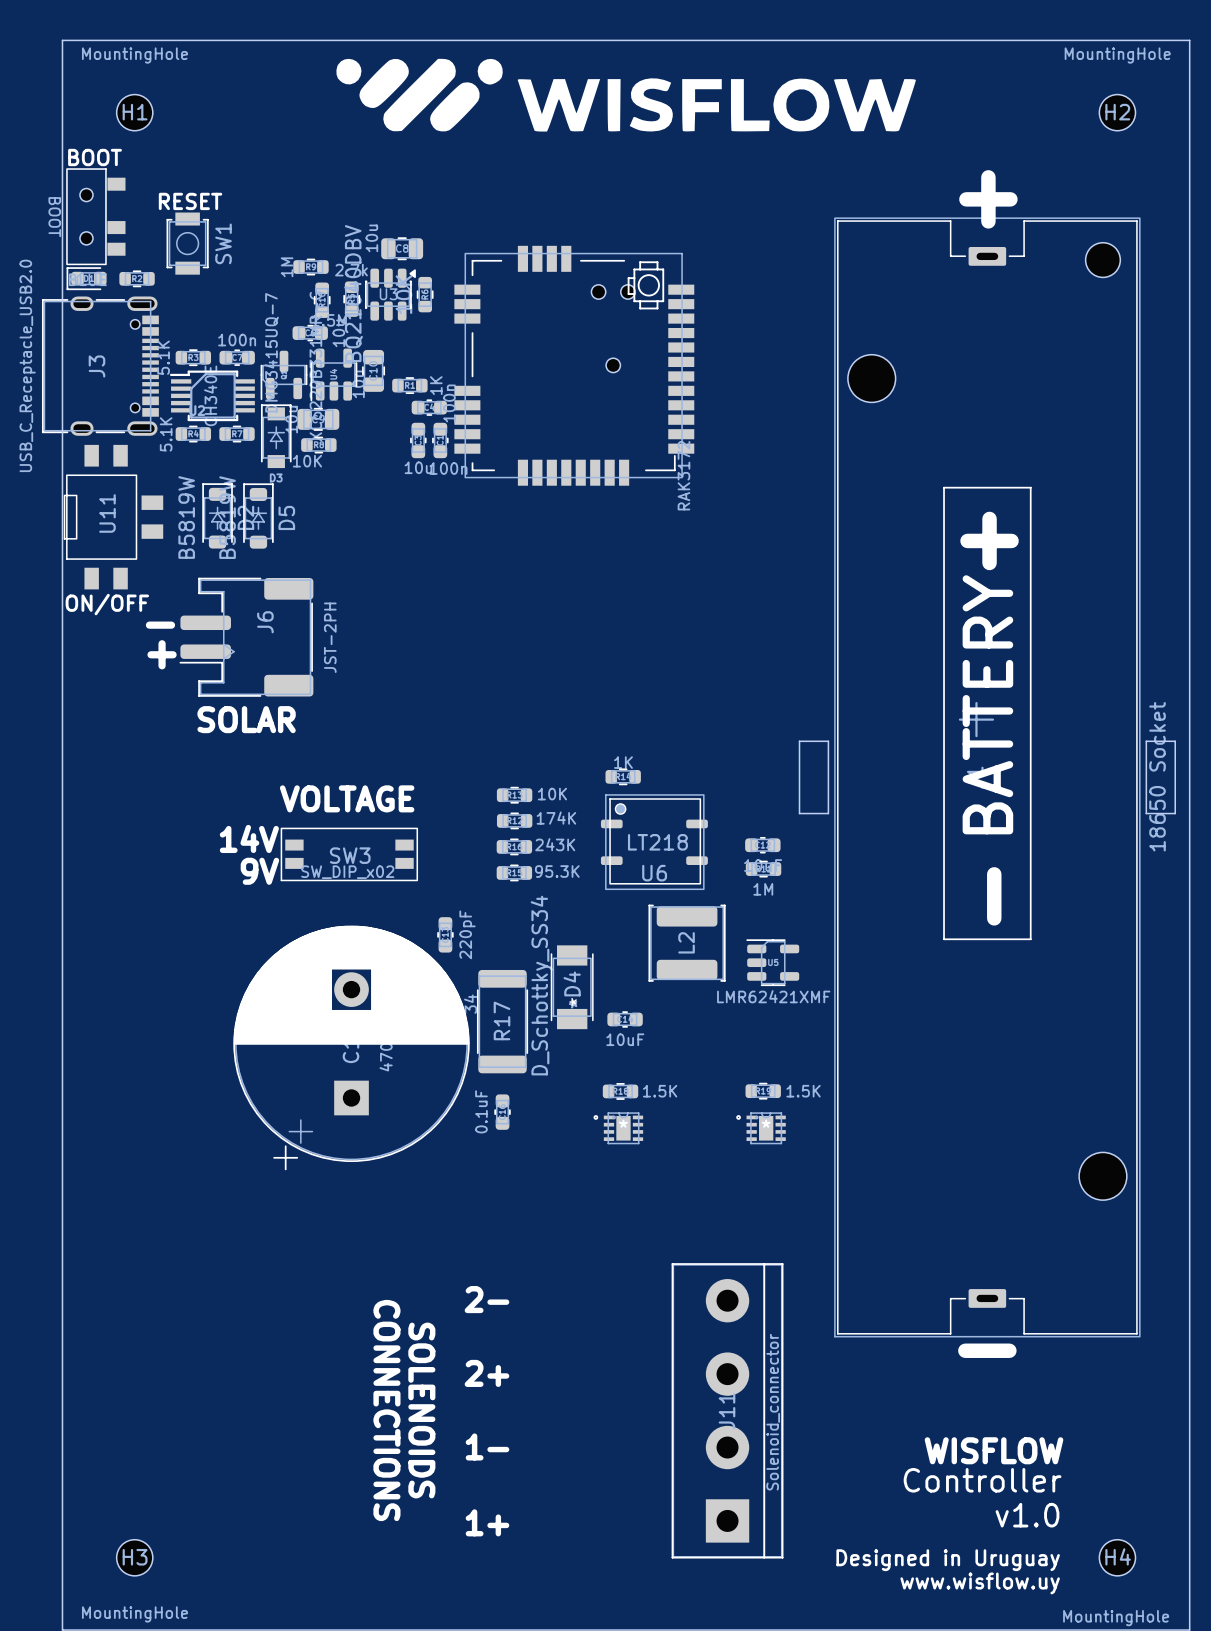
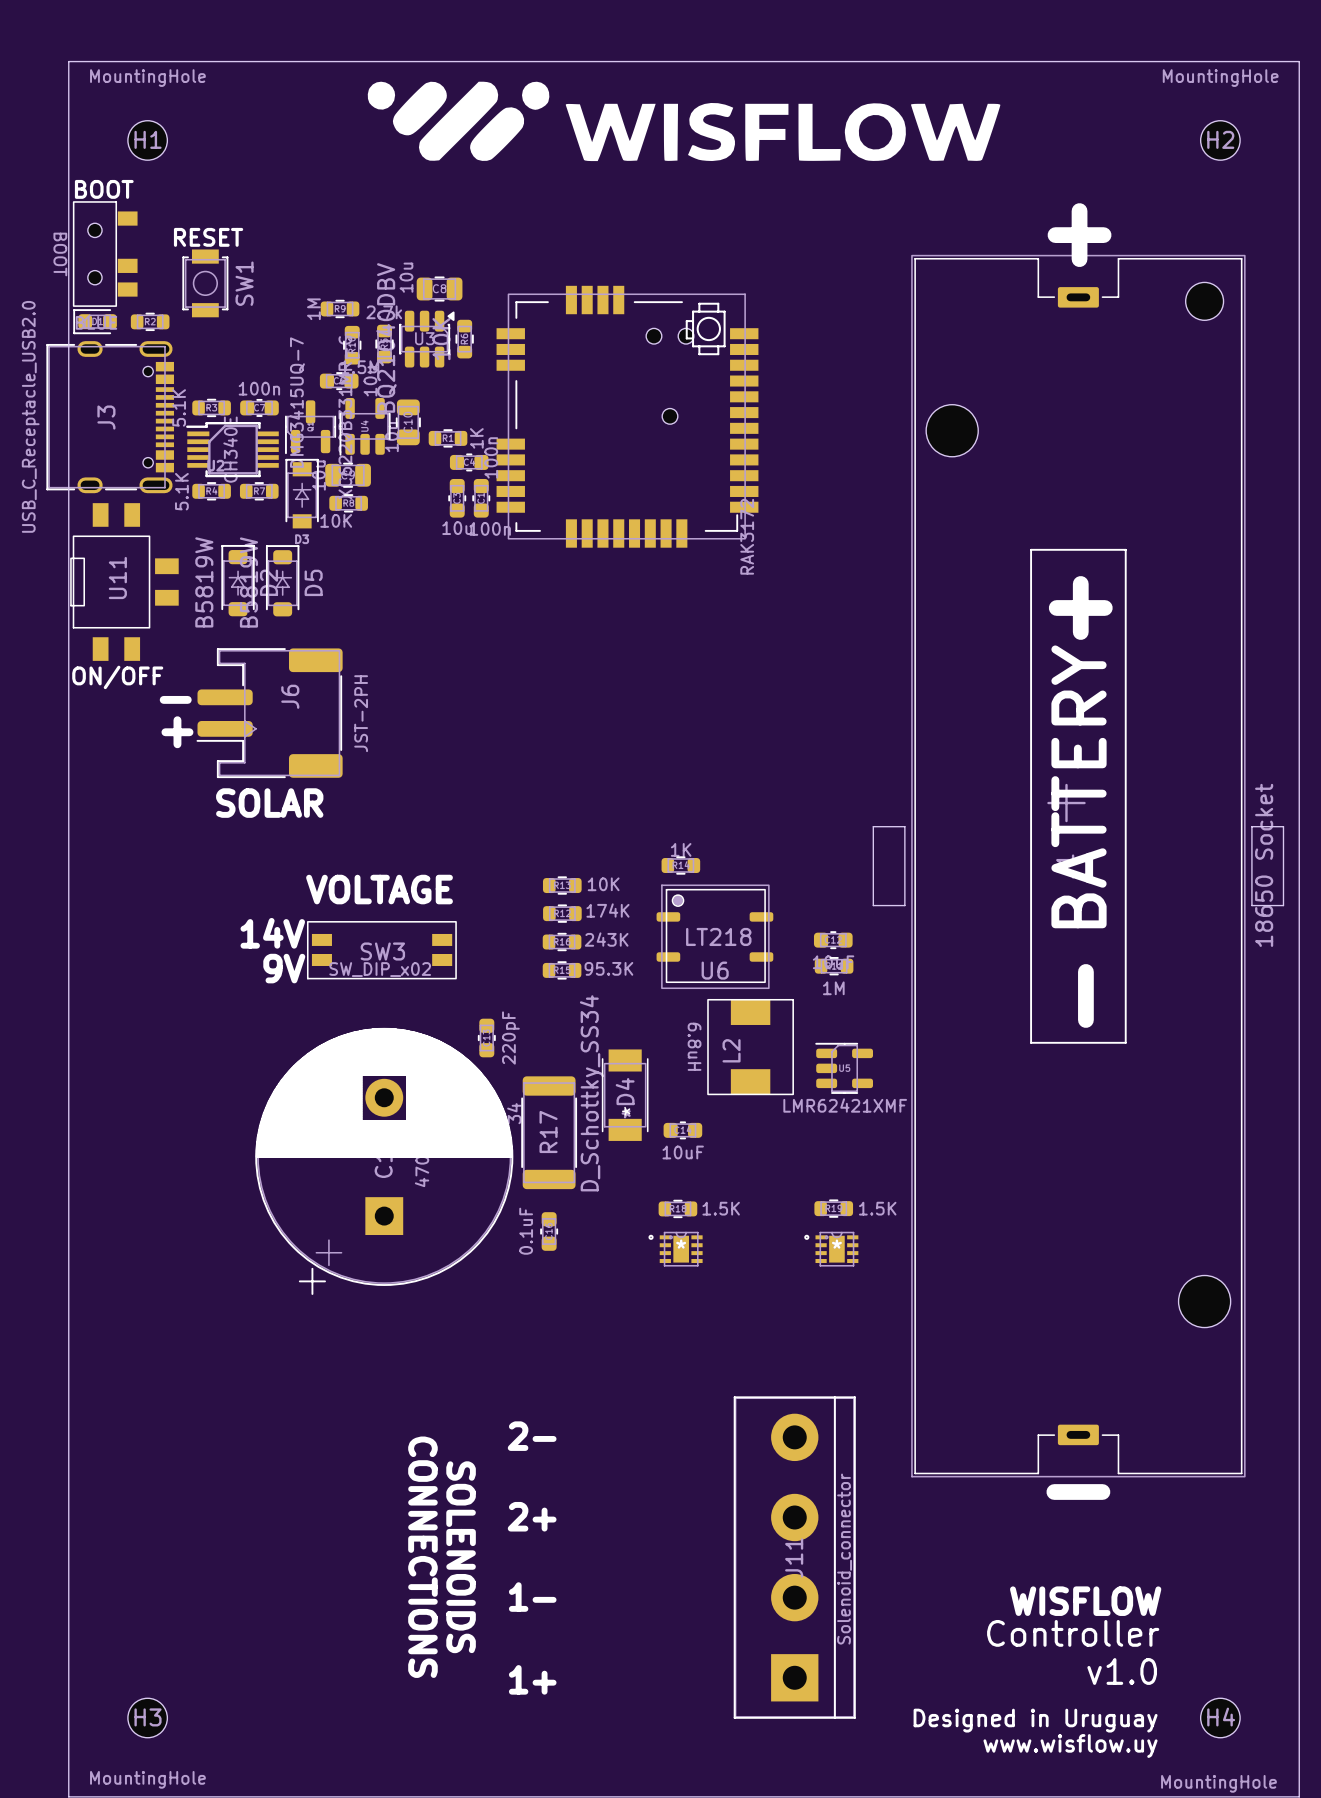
L2 footprint: [648, 904, 726, 982] -> [707, 998, 794, 1096]
L2 value: none -> 6.8uH (694, 1046)

